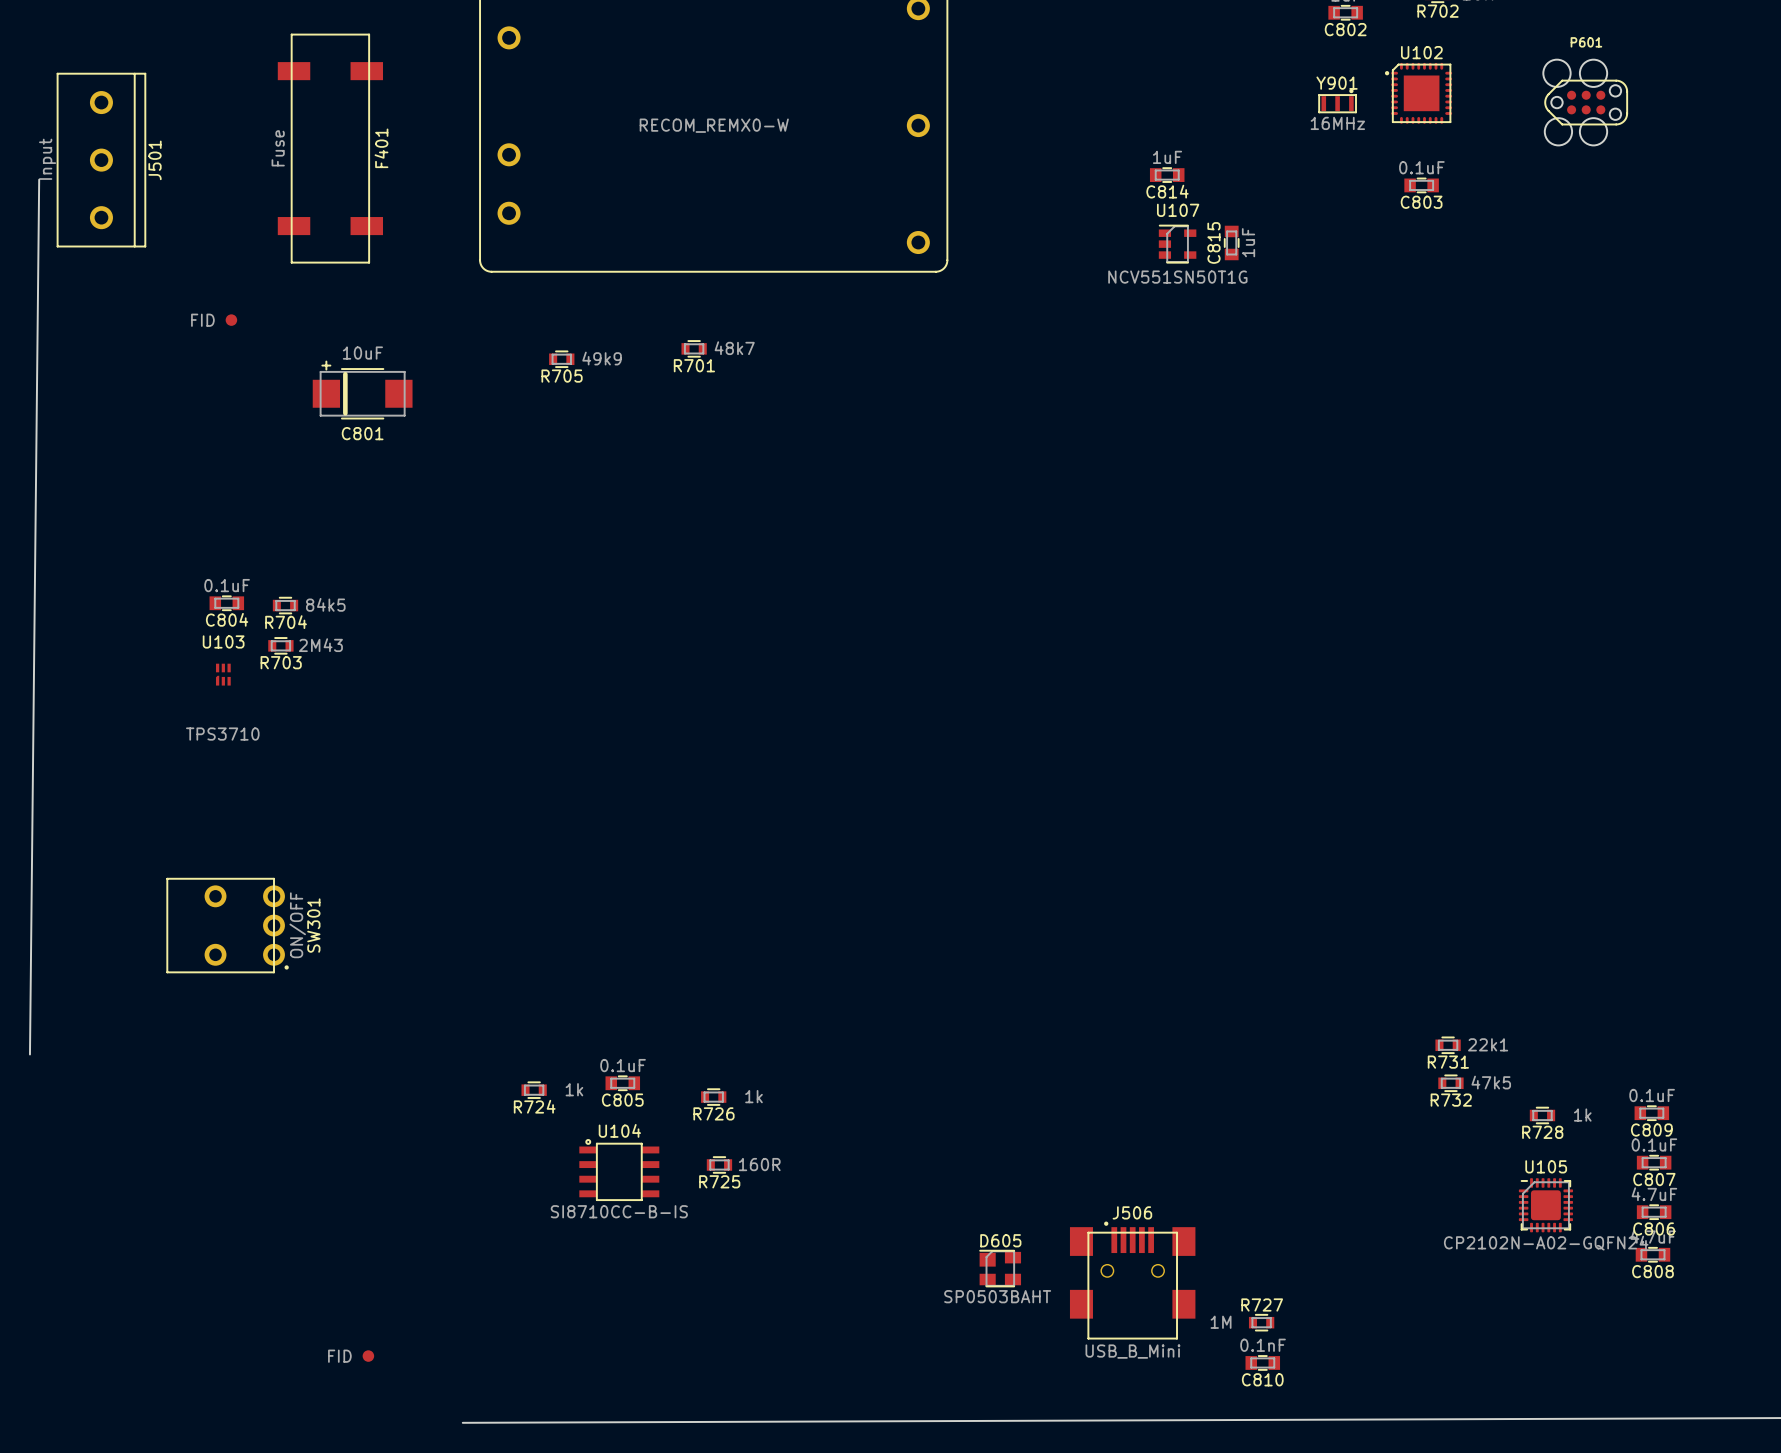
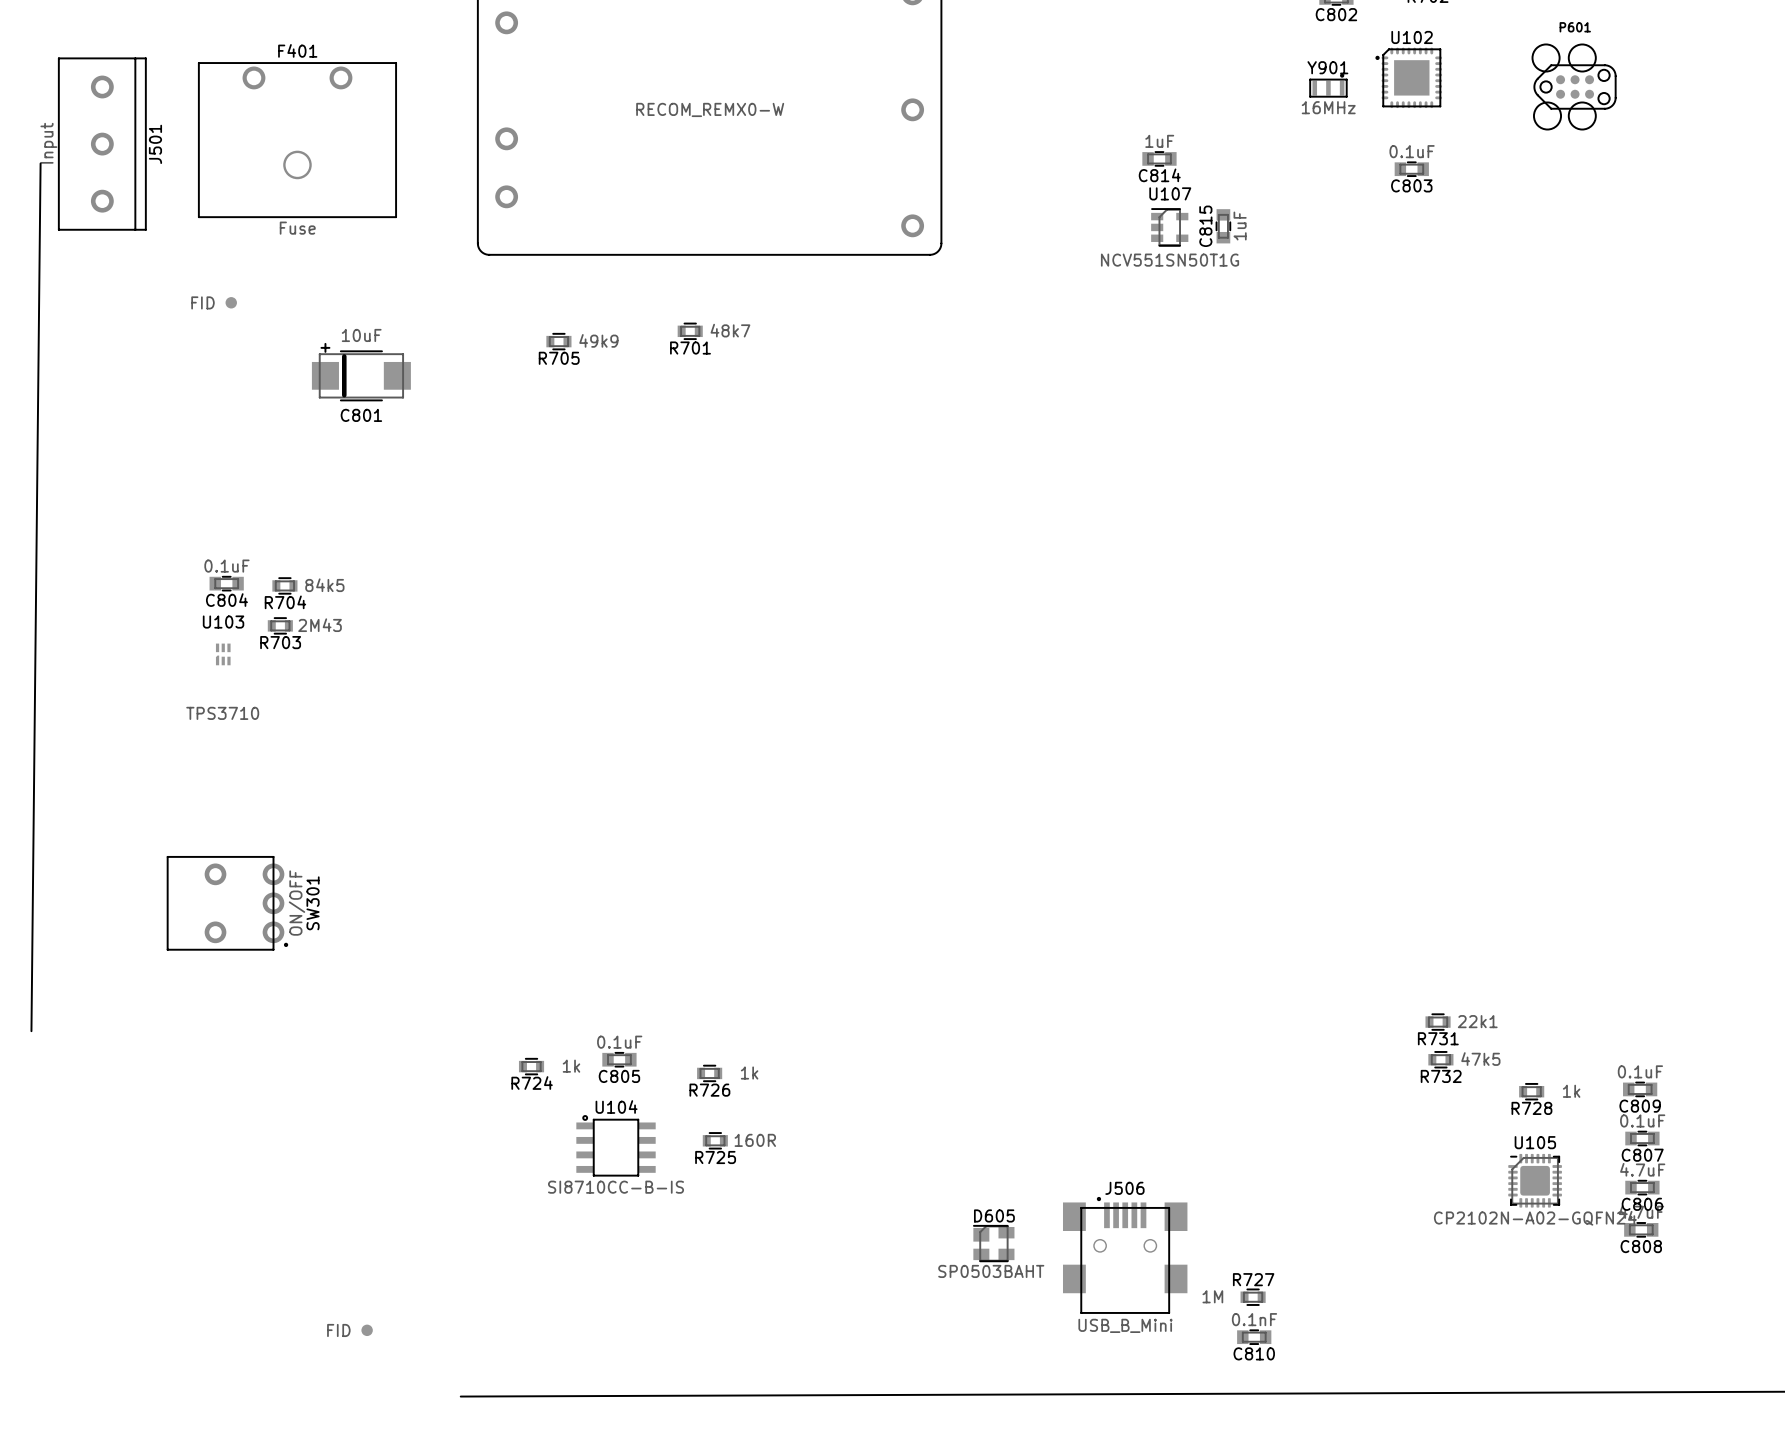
F401 footprint: [277, 33, 384, 264] -> [198, 62, 397, 219]
F401 value position: Fuse (278, 148) -> Fuse (297, 228)
F401 name position: F401 (381, 148) -> F401 (297, 50)

